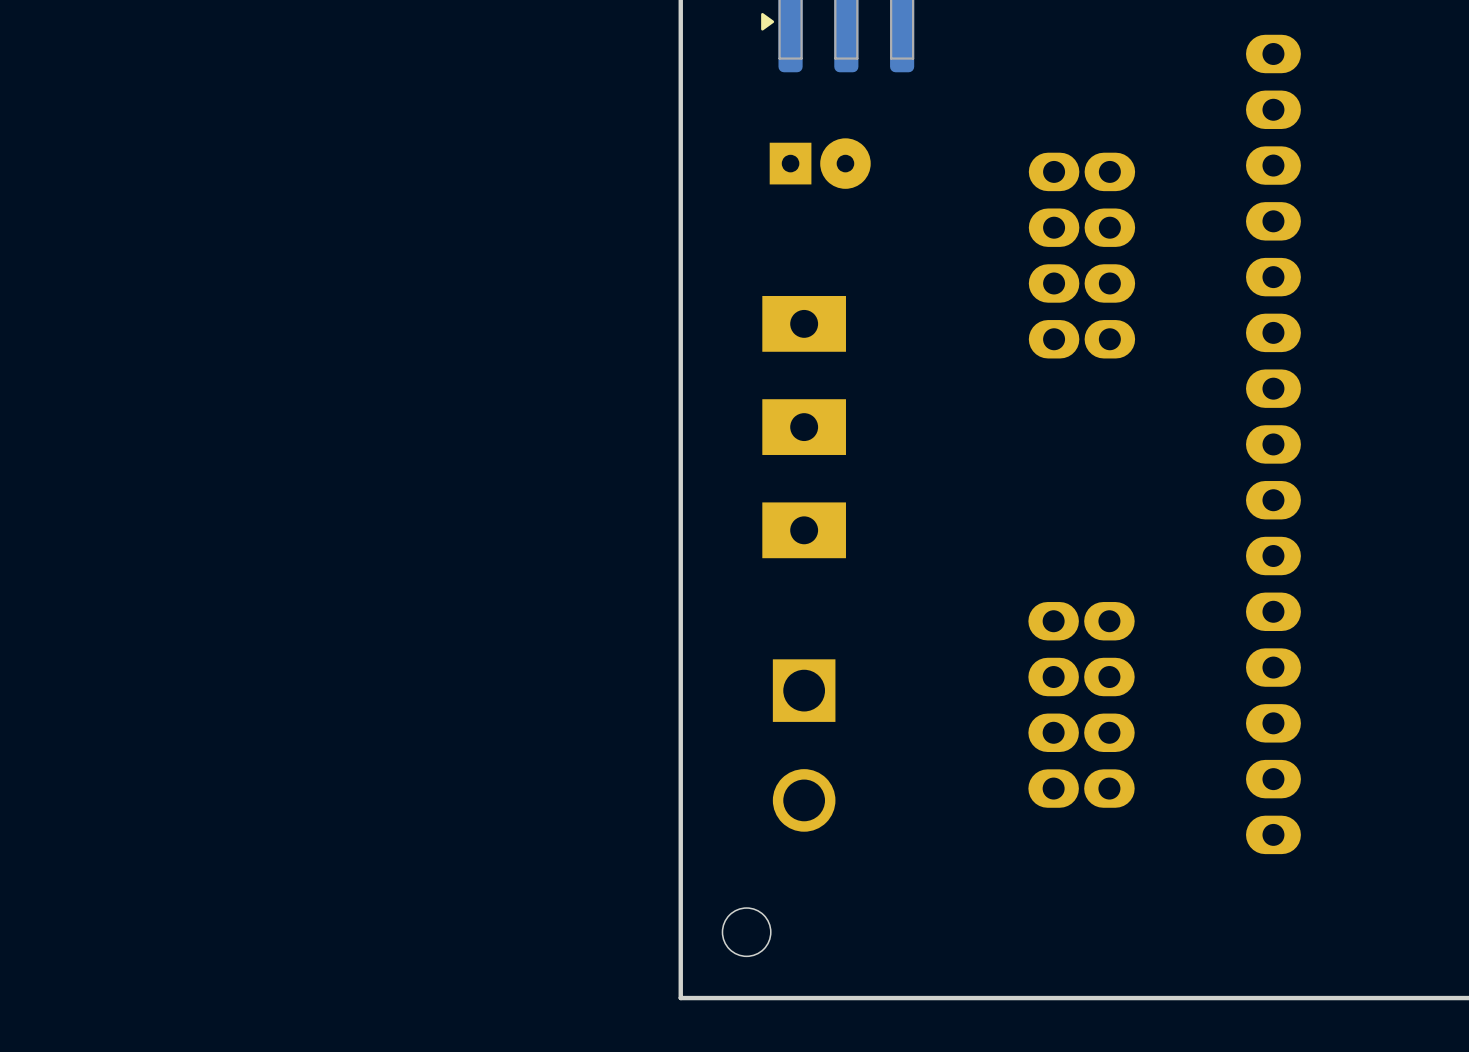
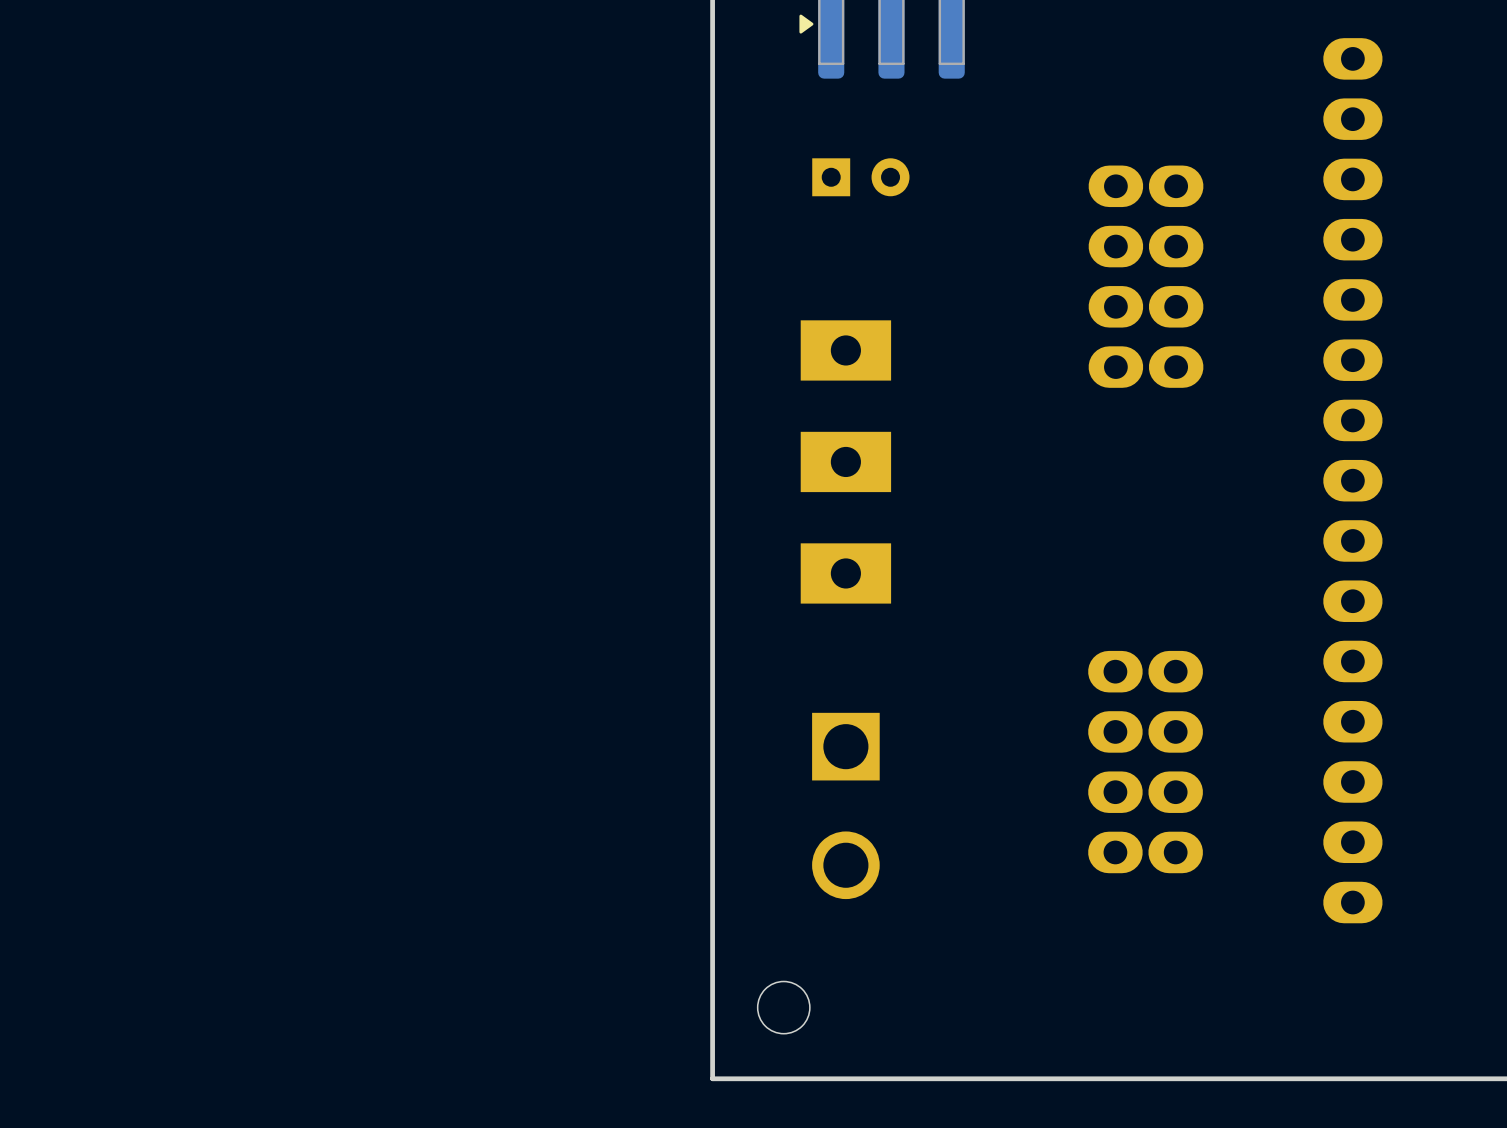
part footprint: [769, 138, 871, 189] -> [812, 158, 910, 197]

